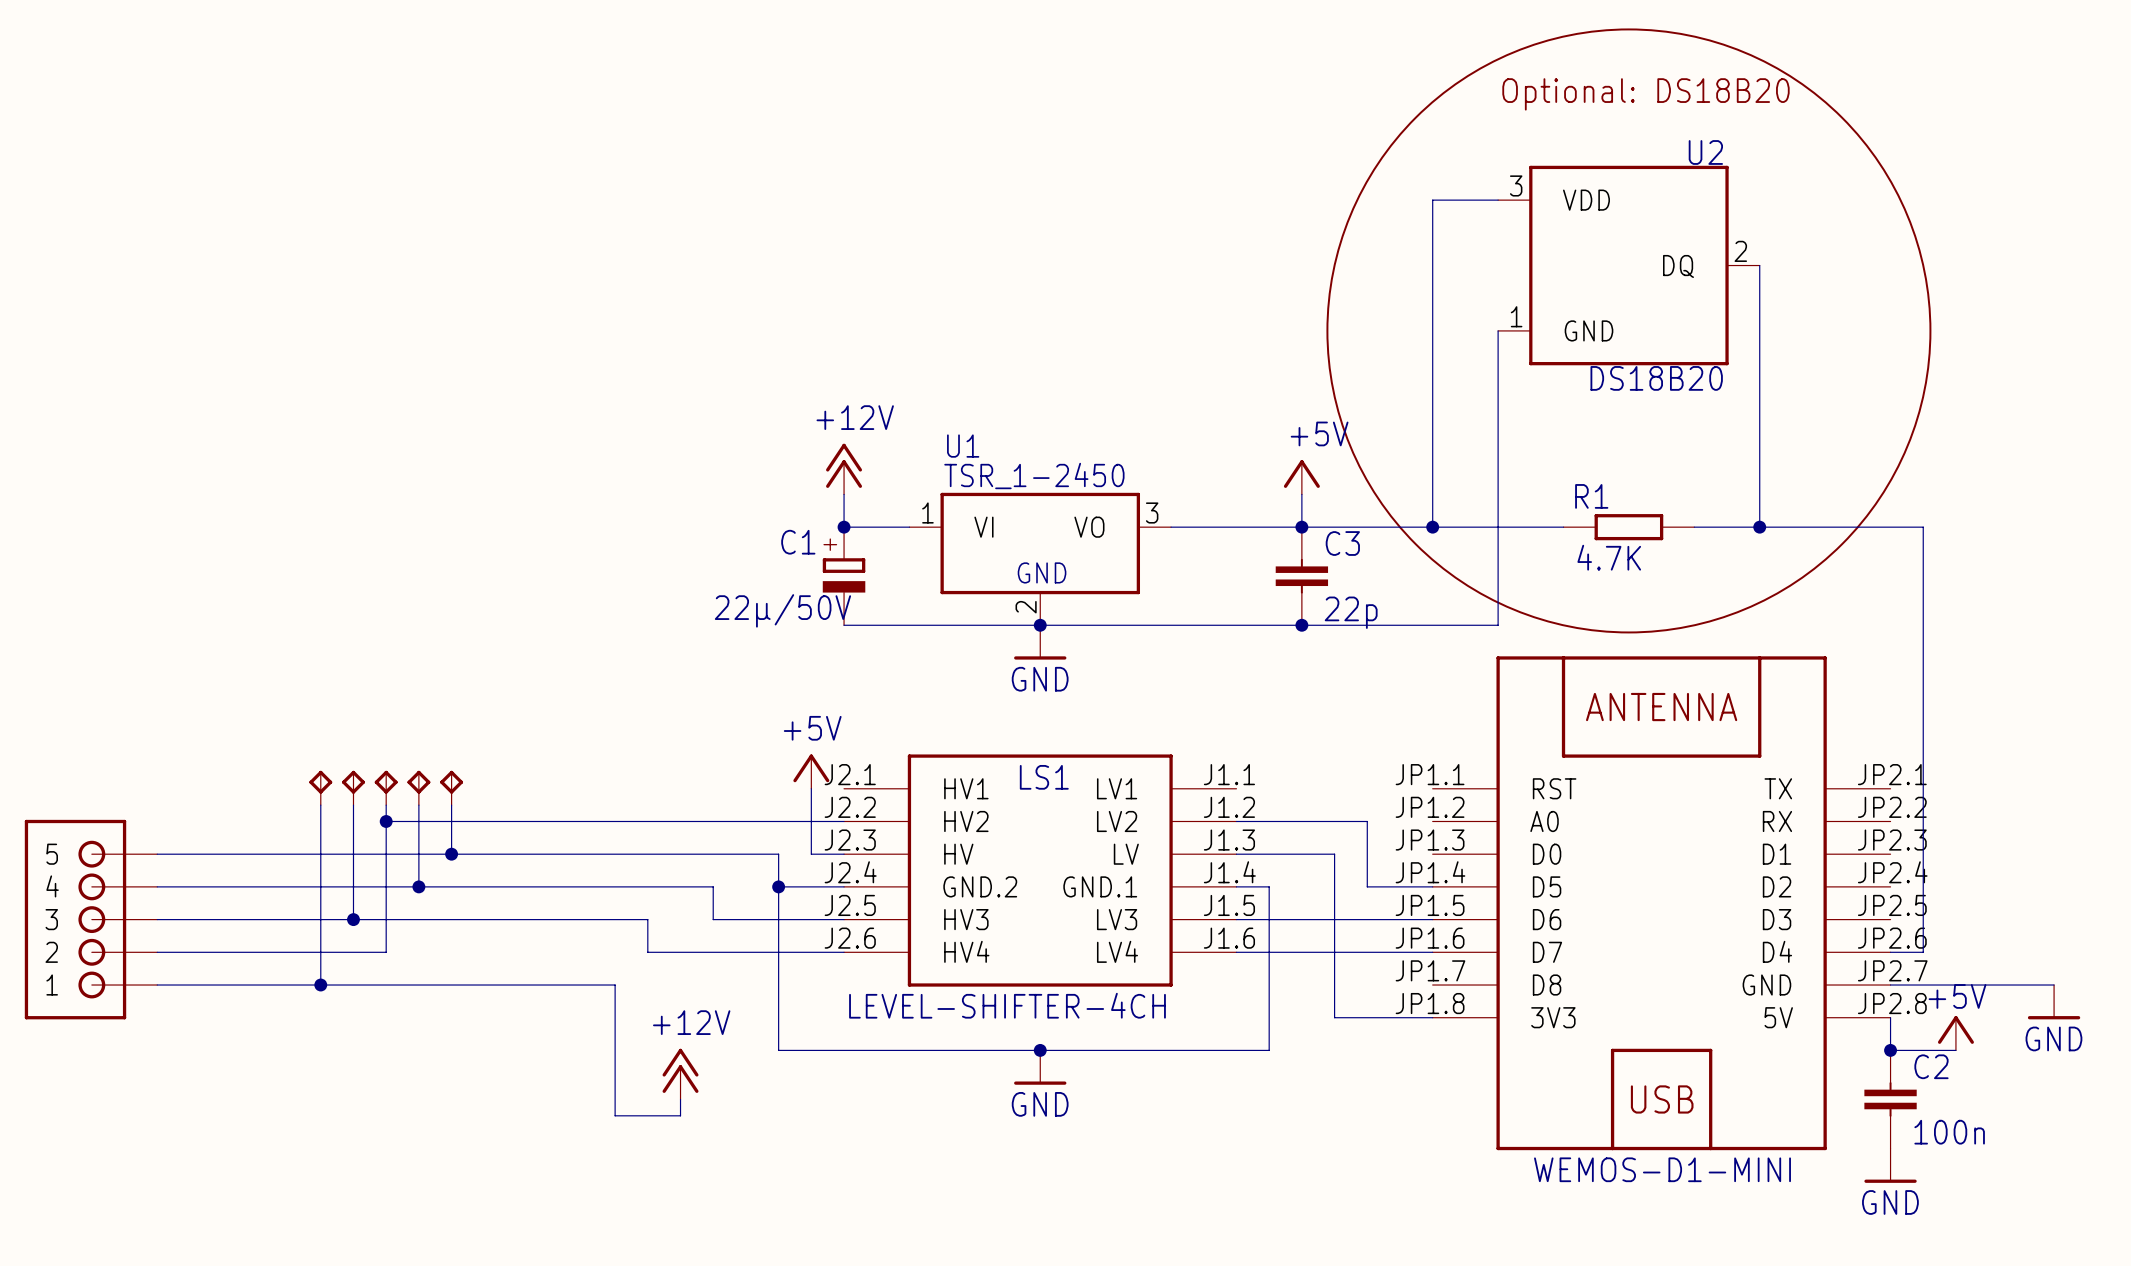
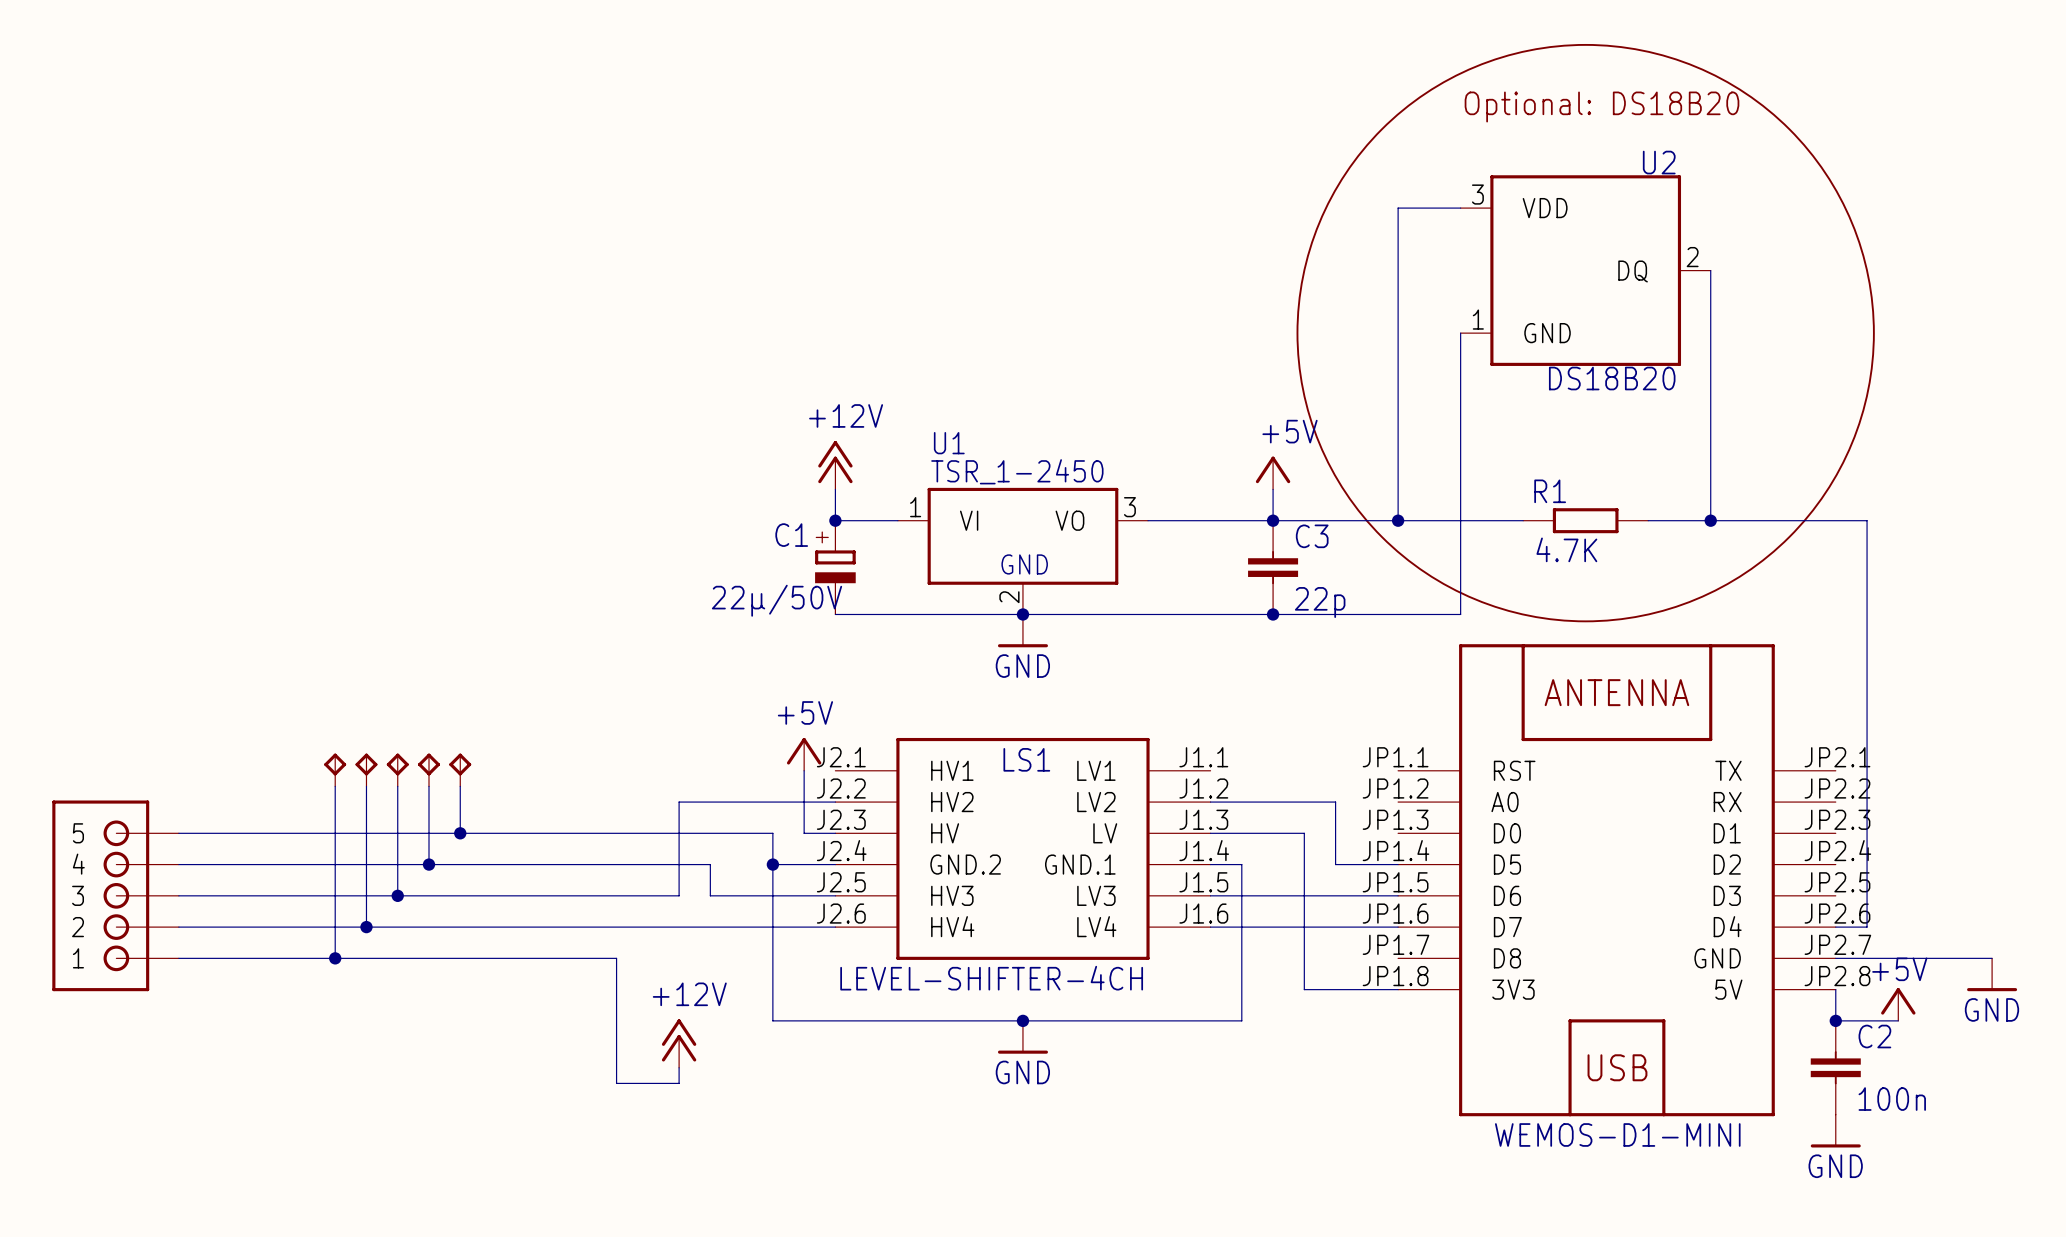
wire: (386, 821) (680, 821) -> none
junction: (386, 821) -> none
wire: none -> (366, 895) (366, 927)
junction: (353, 919) -> none
wire: (386, 919) (386, 952) -> (647, 927) (397, 927)
junction: none -> (397, 895)
wire: (647, 919) (647, 952) -> (647, 895) (679, 895) (679, 802)
junction: none -> (366, 927)

